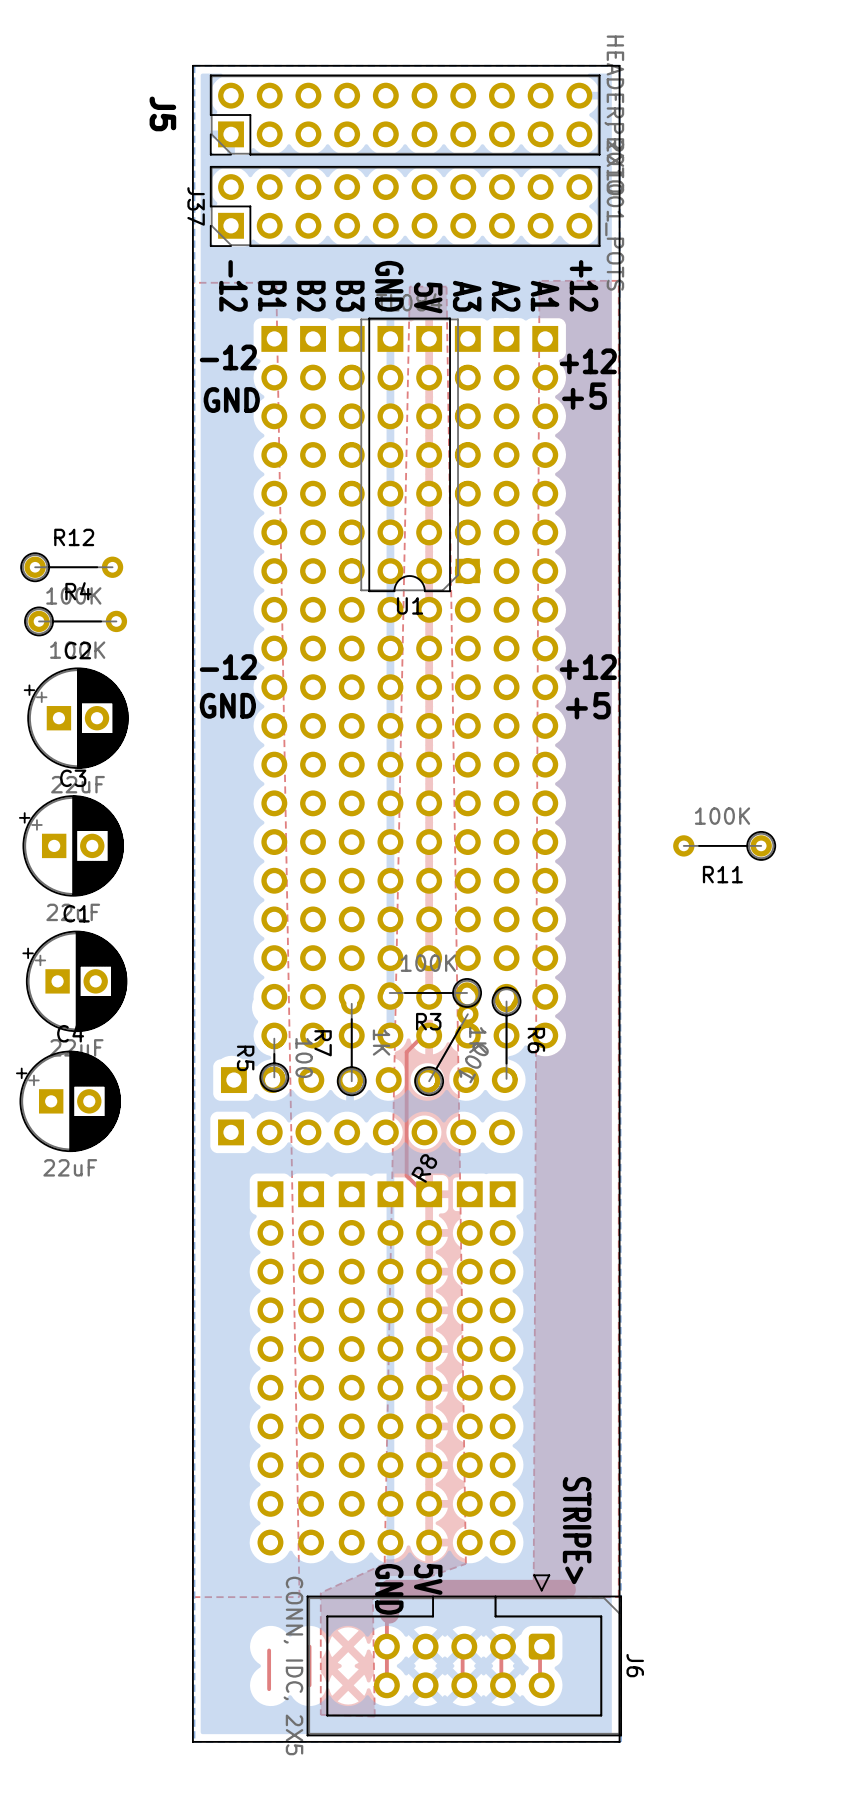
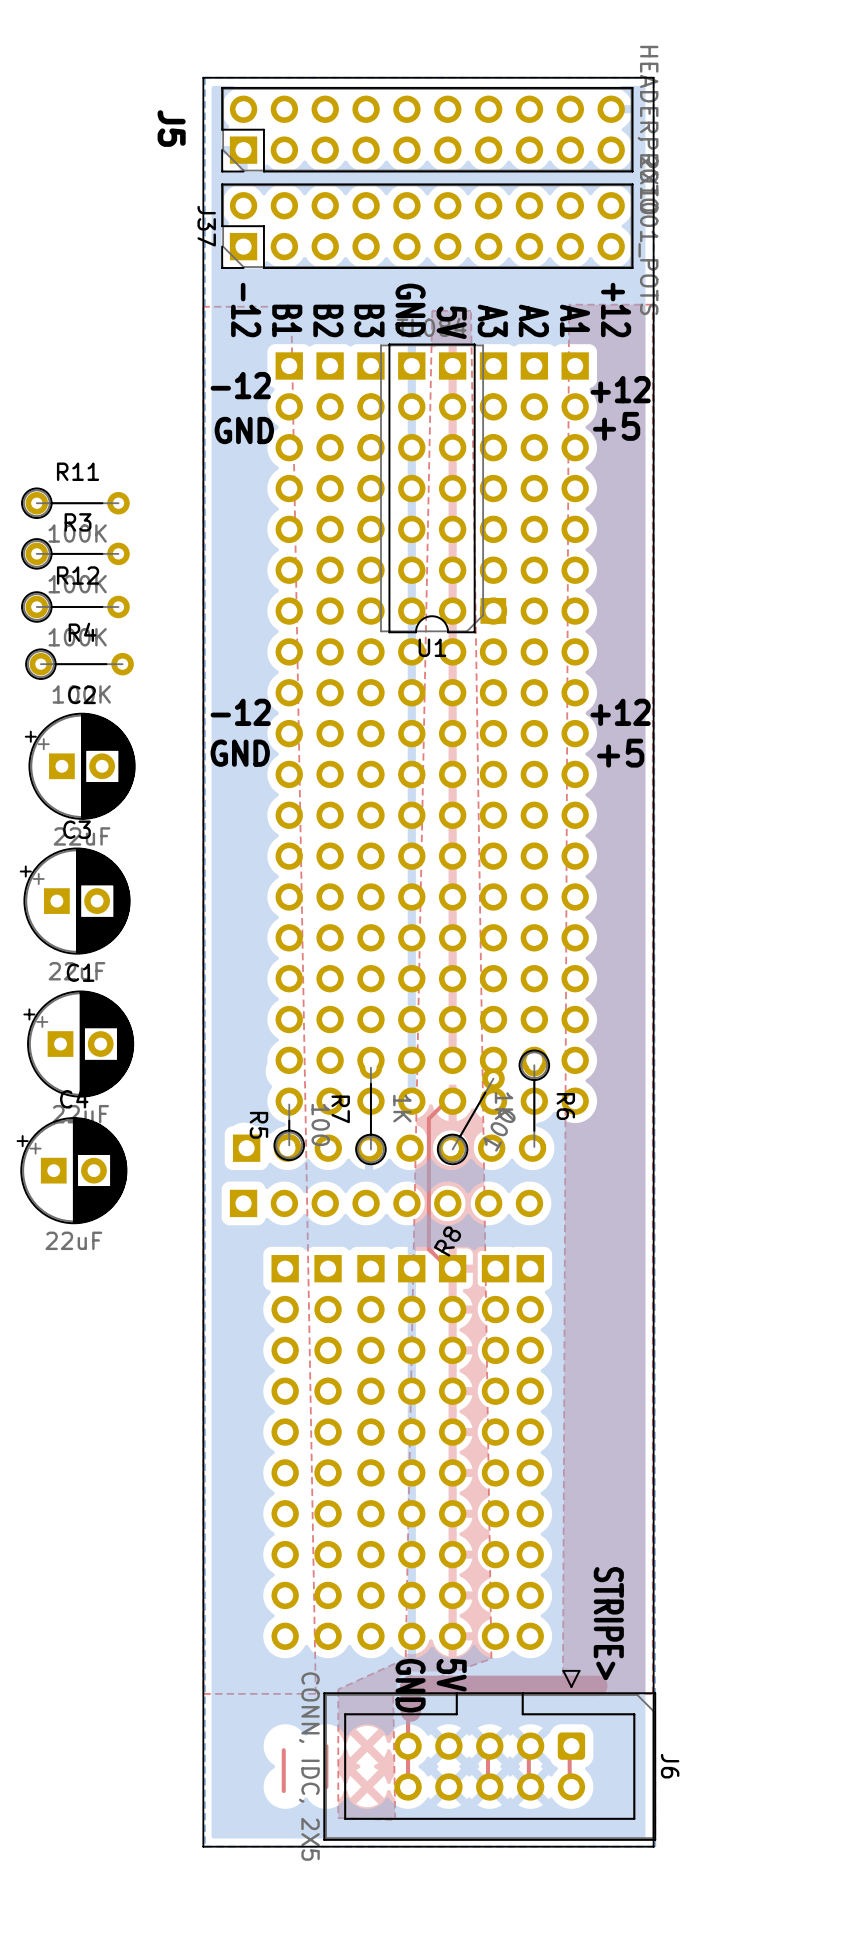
R11 rotation: 0° (724, 845) -> 180° (75, 503)
R11 position: (724, 845) -> (75, 503)
R3 rotation: 0° (430, 992) -> 180° (75, 553)
R3 position: (430, 992) -> (75, 553)

